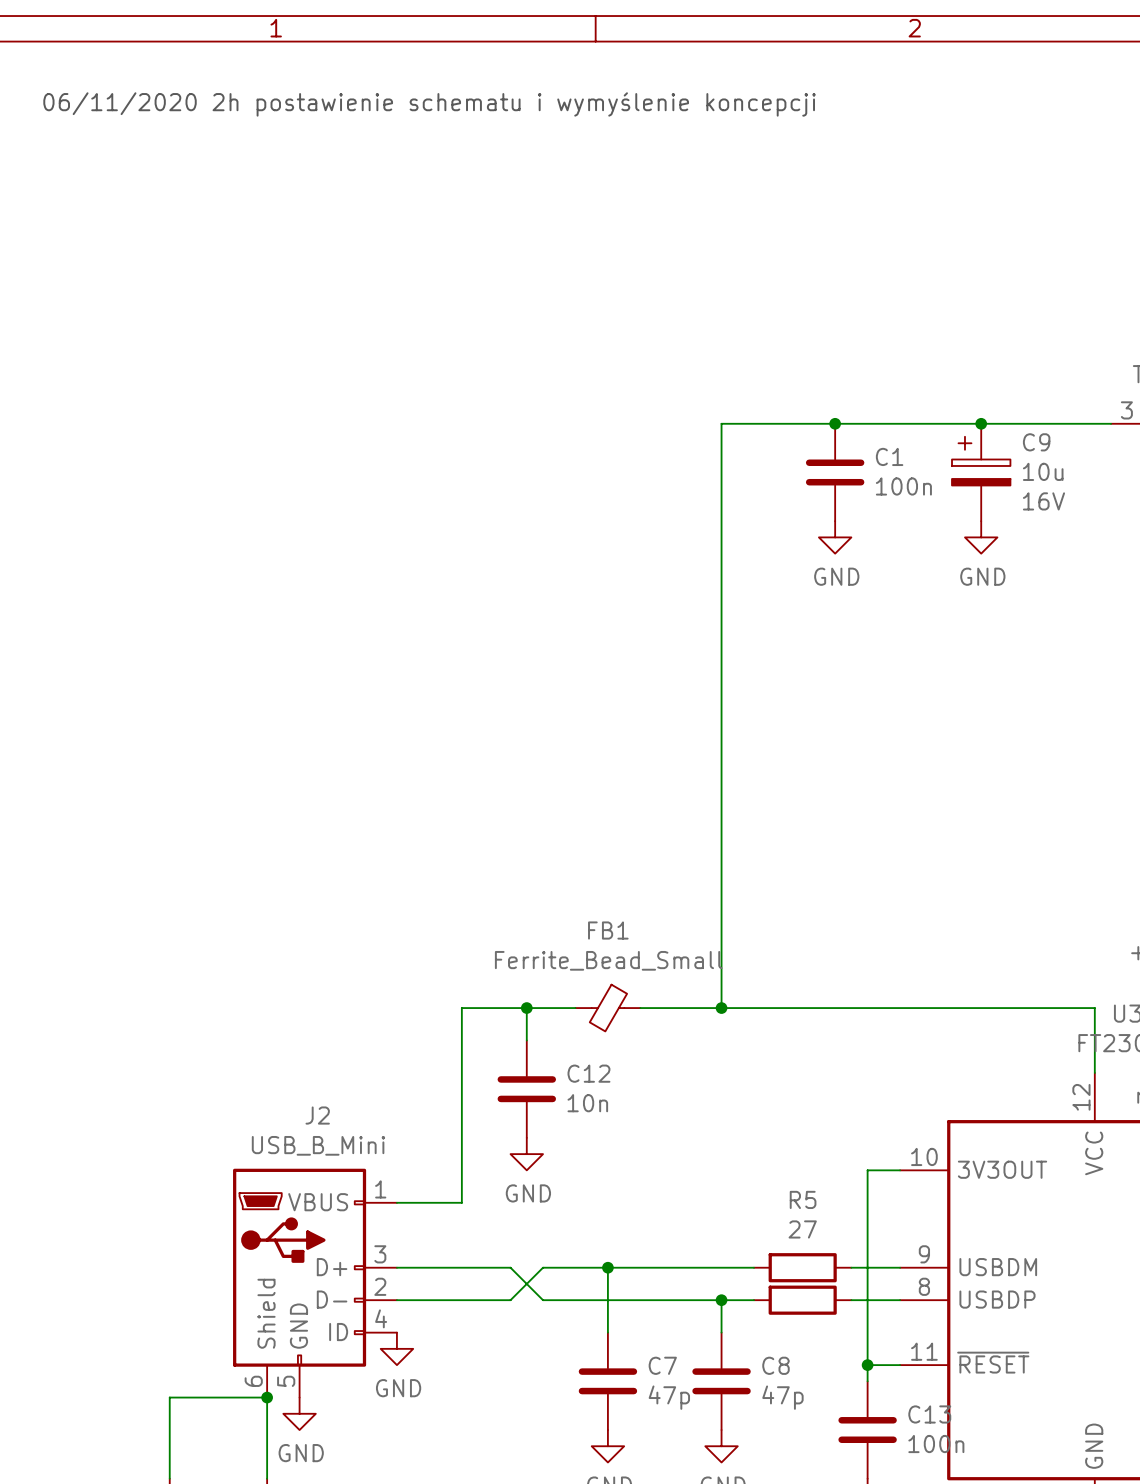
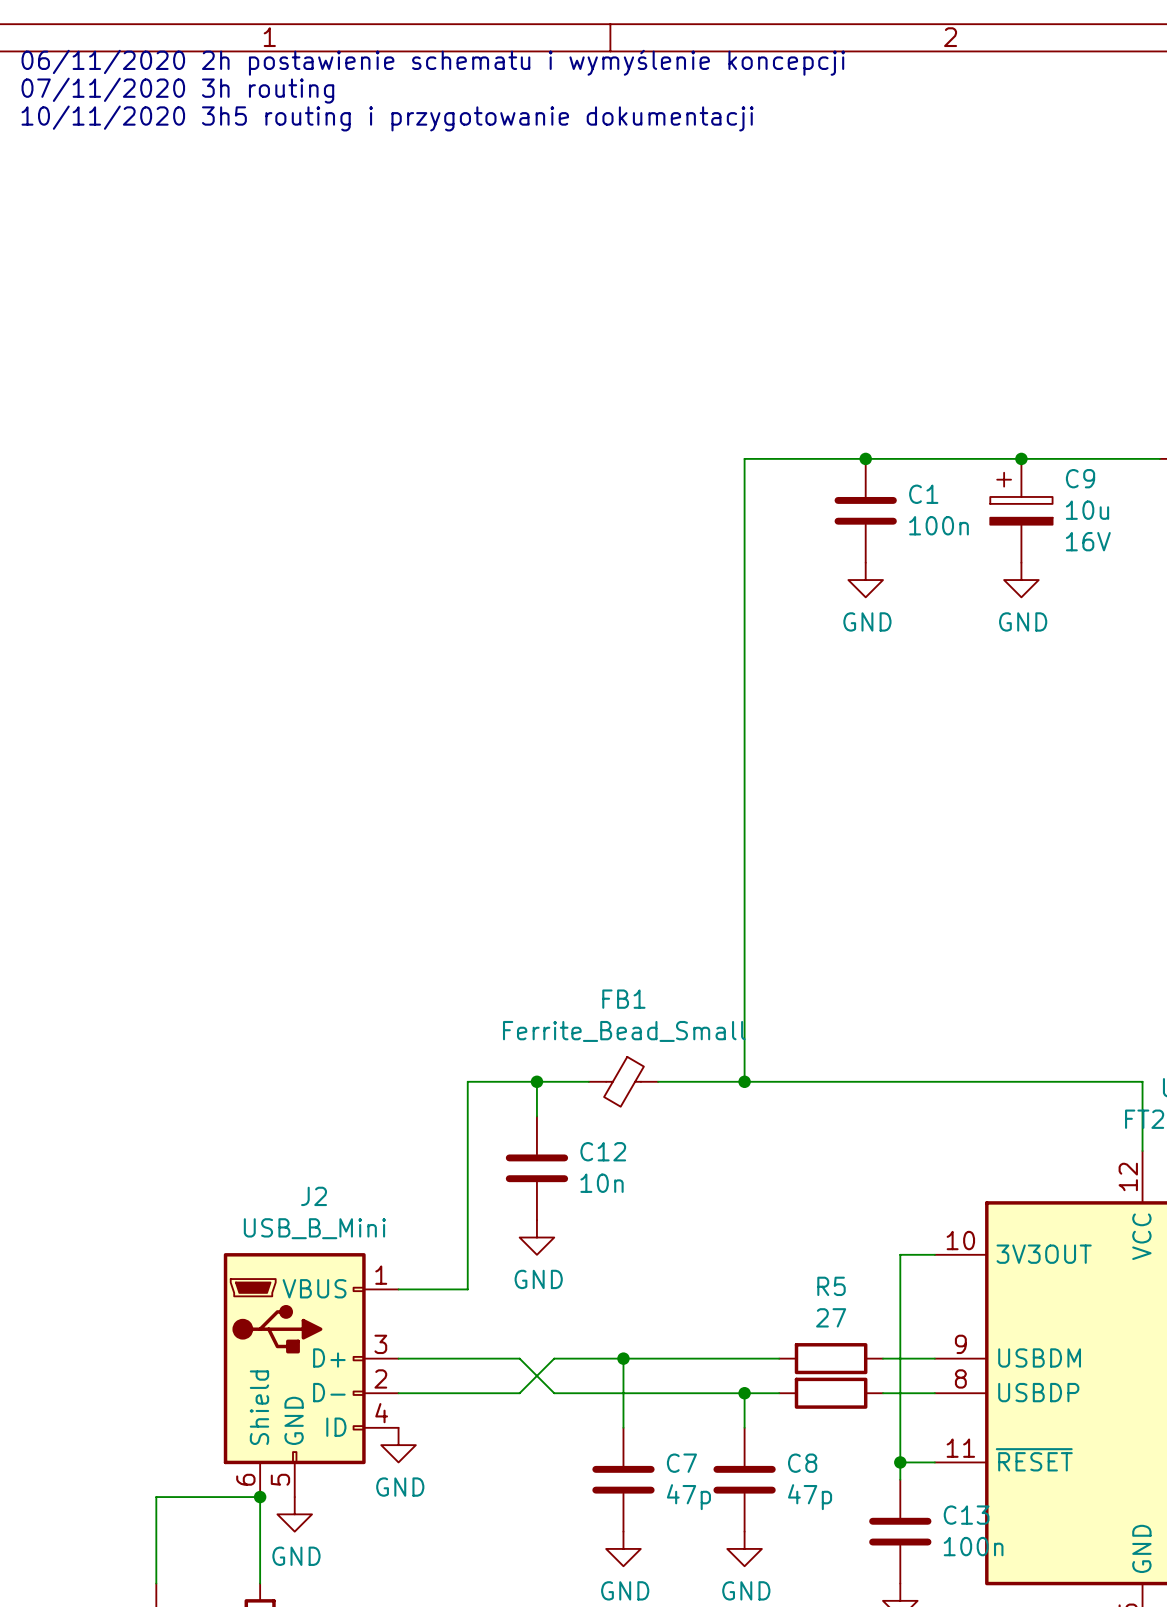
text: none -> 06/11/2020 2h postawienie schematu i wymyślenie koncepcji (433, 62)
text: none -> 07/11/2020 3h routing (177, 90)
text: 06/11/2020 2h postawienie schematu i wymyślenie koncepcji (429, 104) -> 10/11/2020 3h5 routing i przygotowanie dokumentacji (387, 118)

